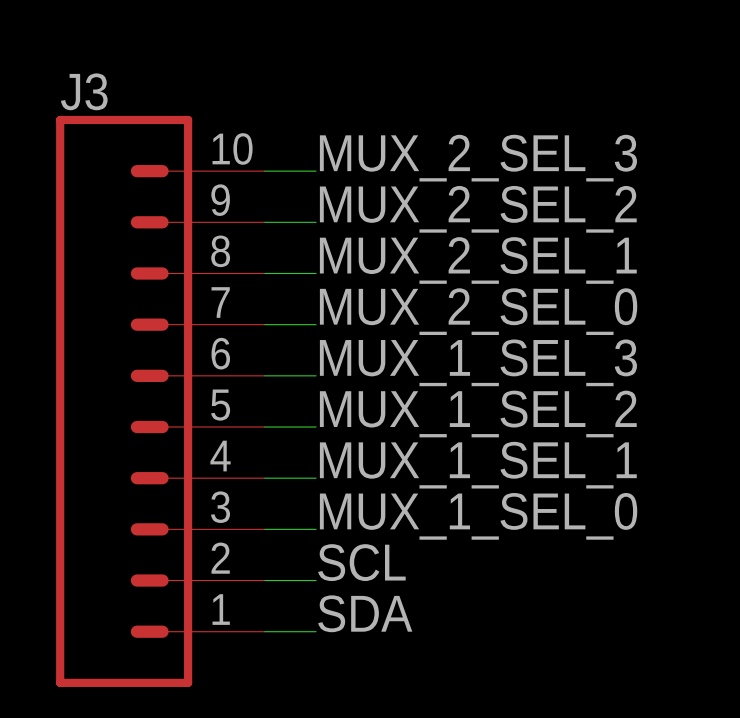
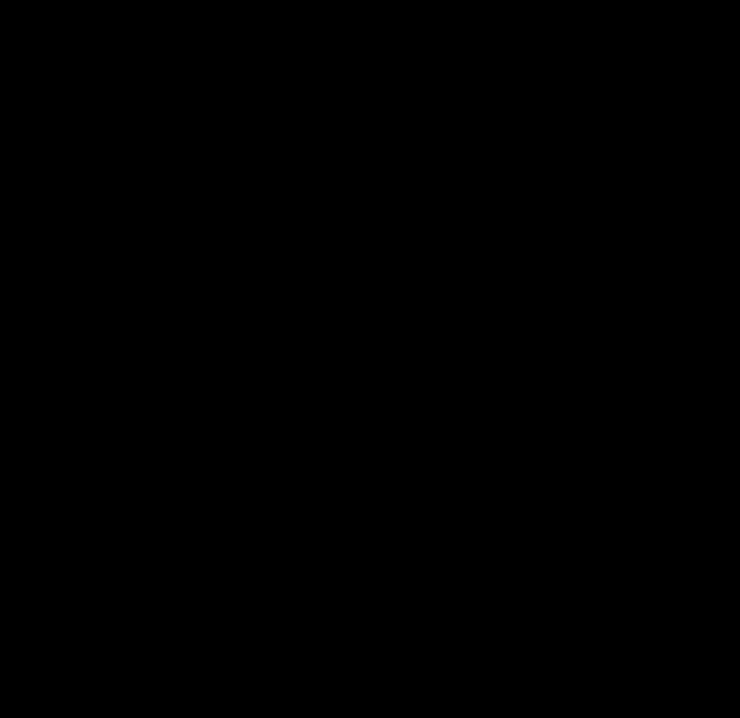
label: MUX_2_SEL_3 (478, 158) -> none
wire: (264, 171) (316, 171) -> none
label: MUX_2_SEL_2 (478, 209) -> none
wire: (264, 222) (316, 222) -> none
label: MUX_2_SEL_1 (478, 260) -> none
wire: (264, 273) (316, 273) -> none
label: MUX_2_SEL_0 (478, 311) -> none
wire: (264, 324) (316, 324) -> none
label: MUX_1_SEL_3 (478, 362) -> none
wire: (264, 375) (316, 375) -> none
J3: (160, 401) -> none
label: MUX_1_SEL_2 (478, 414) -> none
wire: (264, 427) (316, 427) -> none
label: MUX_1_SEL_1 (478, 465) -> none
wire: (264, 478) (316, 478) -> none
label: MUX_1_SEL_0 (478, 516) -> none
wire: (264, 529) (316, 529) -> none
label: SCL (361, 562) -> none
wire: (264, 580) (316, 580) -> none
label: SDA (365, 613) -> none
wire: (264, 631) (316, 631) -> none

